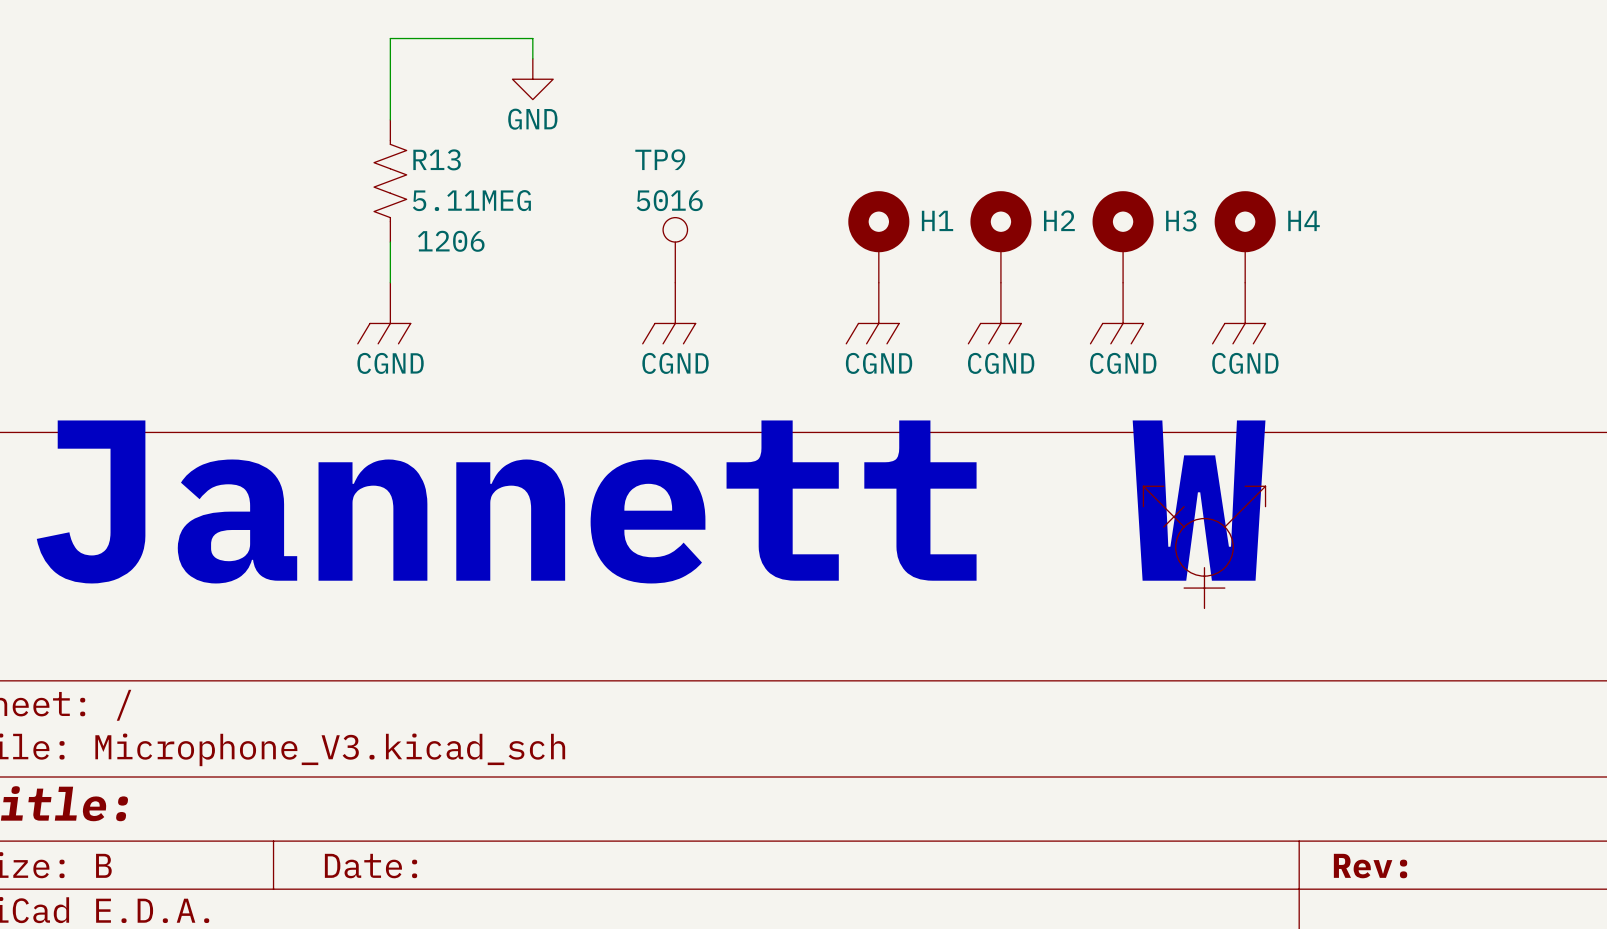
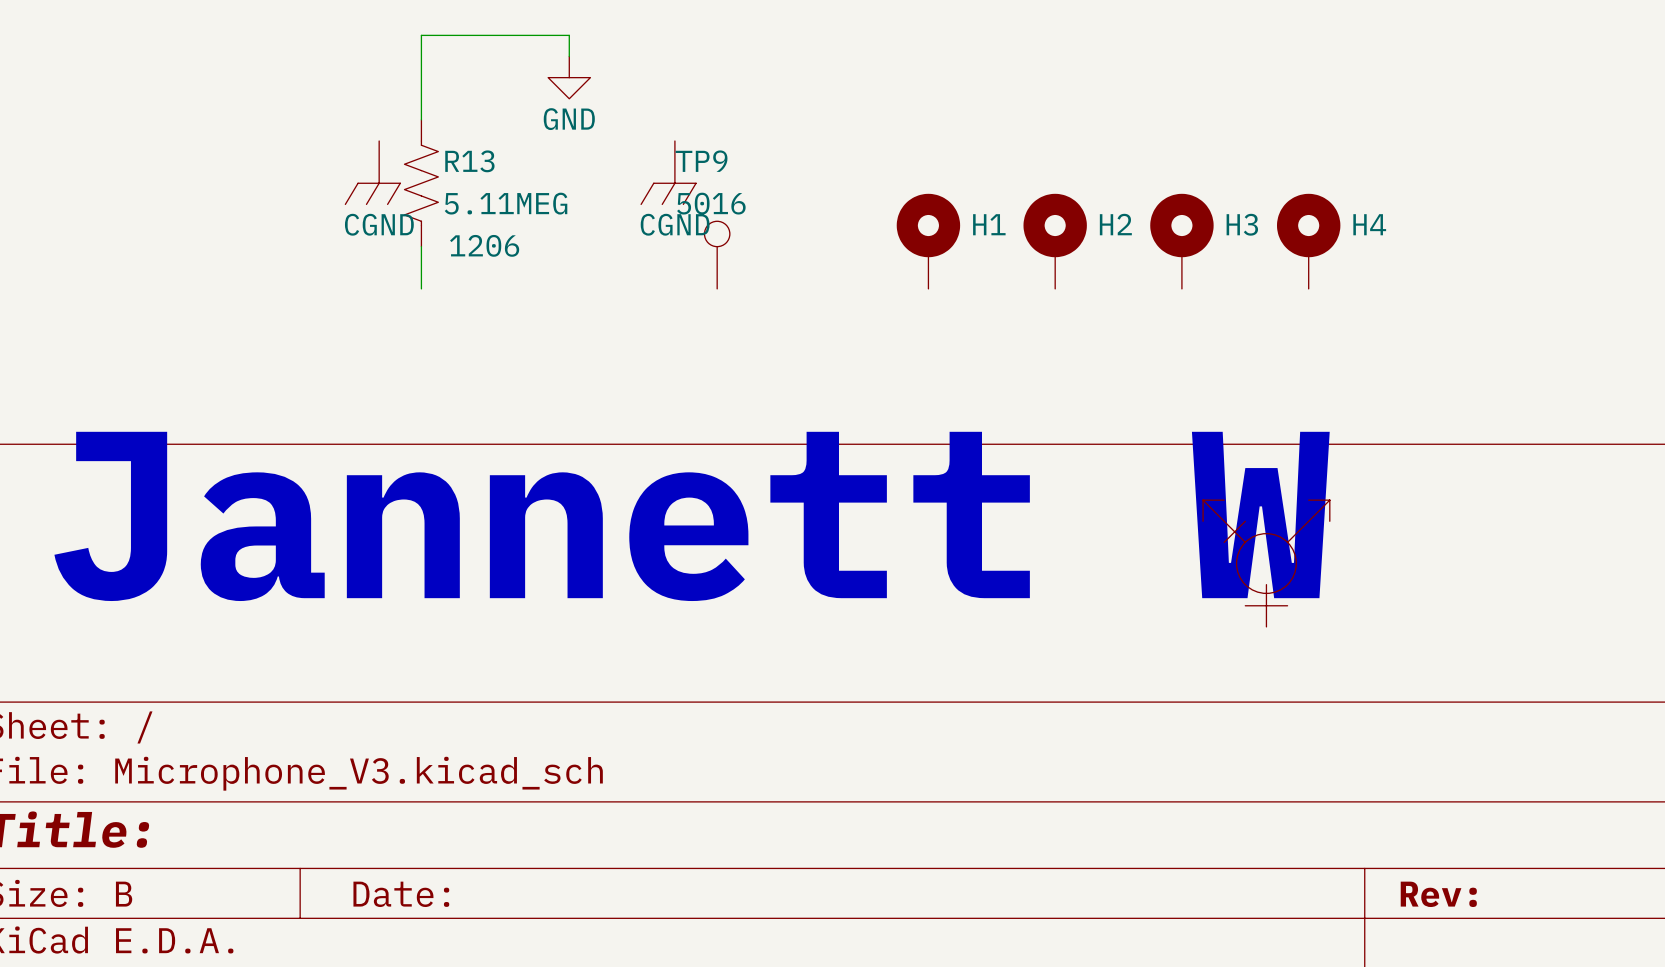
power symbol: none -> CGND (372, 172)
power symbol: none -> CGND (668, 172)
power symbol: CGND (384, 313) -> none
power symbol: CGND (669, 313) -> none
power symbol: CGND (872, 313) -> none
power symbol: CGND (994, 313) -> none
power symbol: CGND (1116, 313) -> none
power symbol: CGND (1239, 313) -> none

